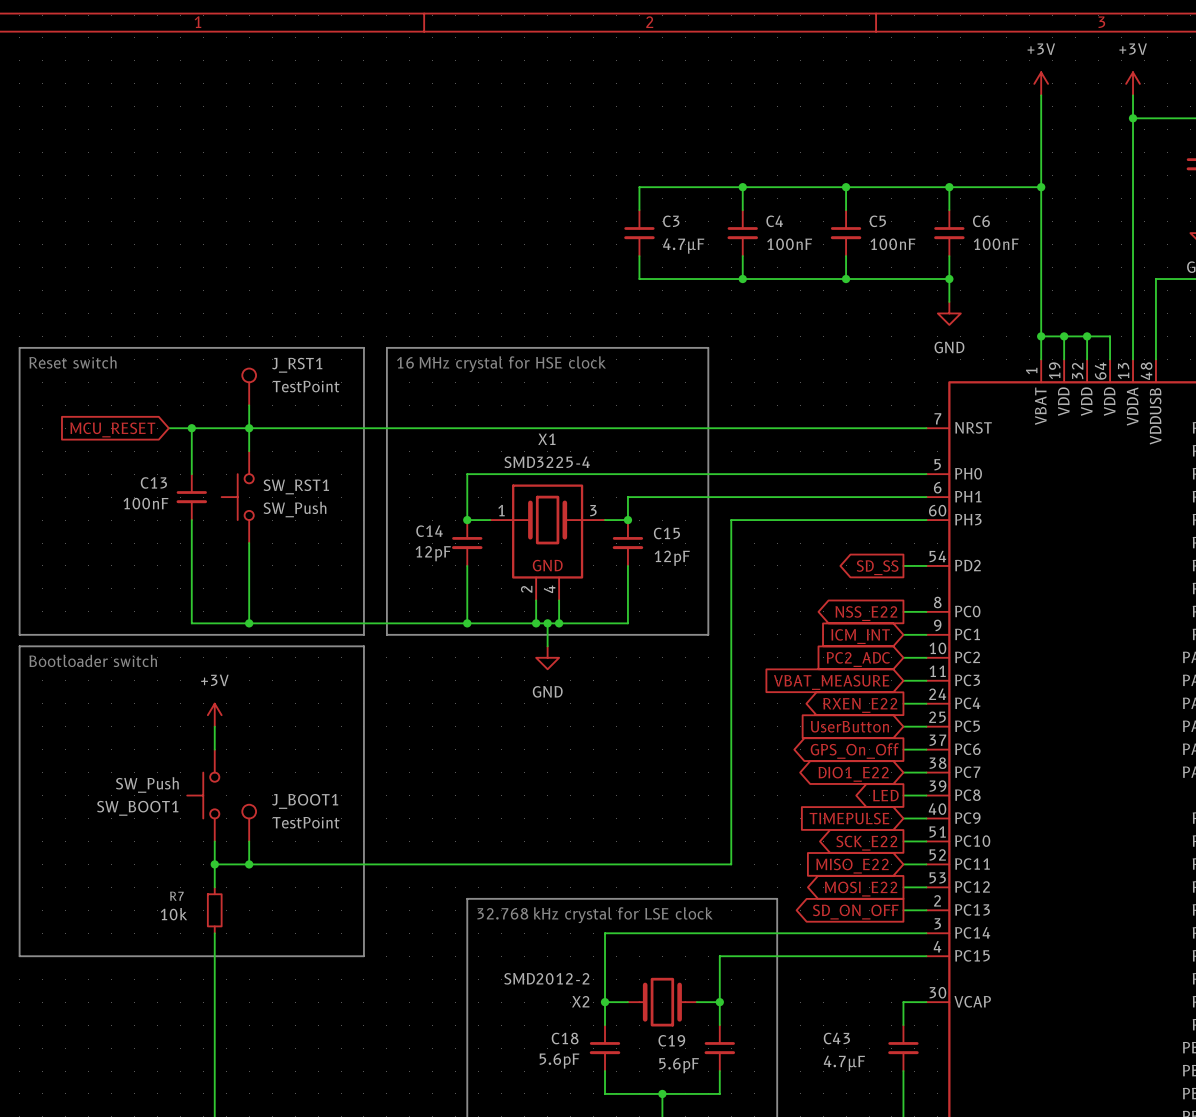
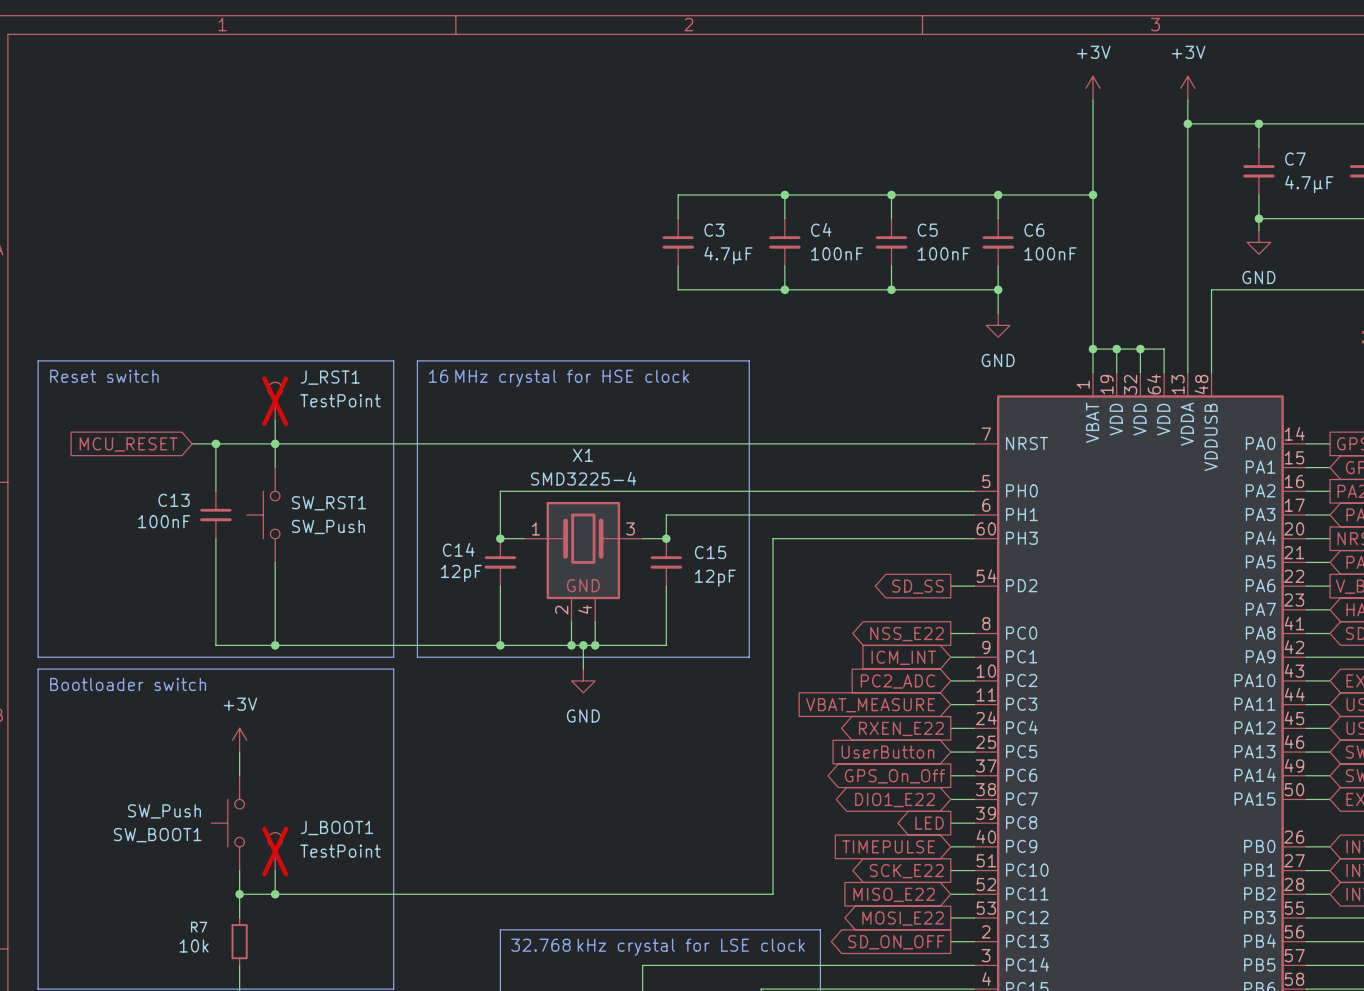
J_RST1 do-not-place cross: none -> (275, 401)
J_BOOT1 do-not-place cross: none -> (275, 851)

